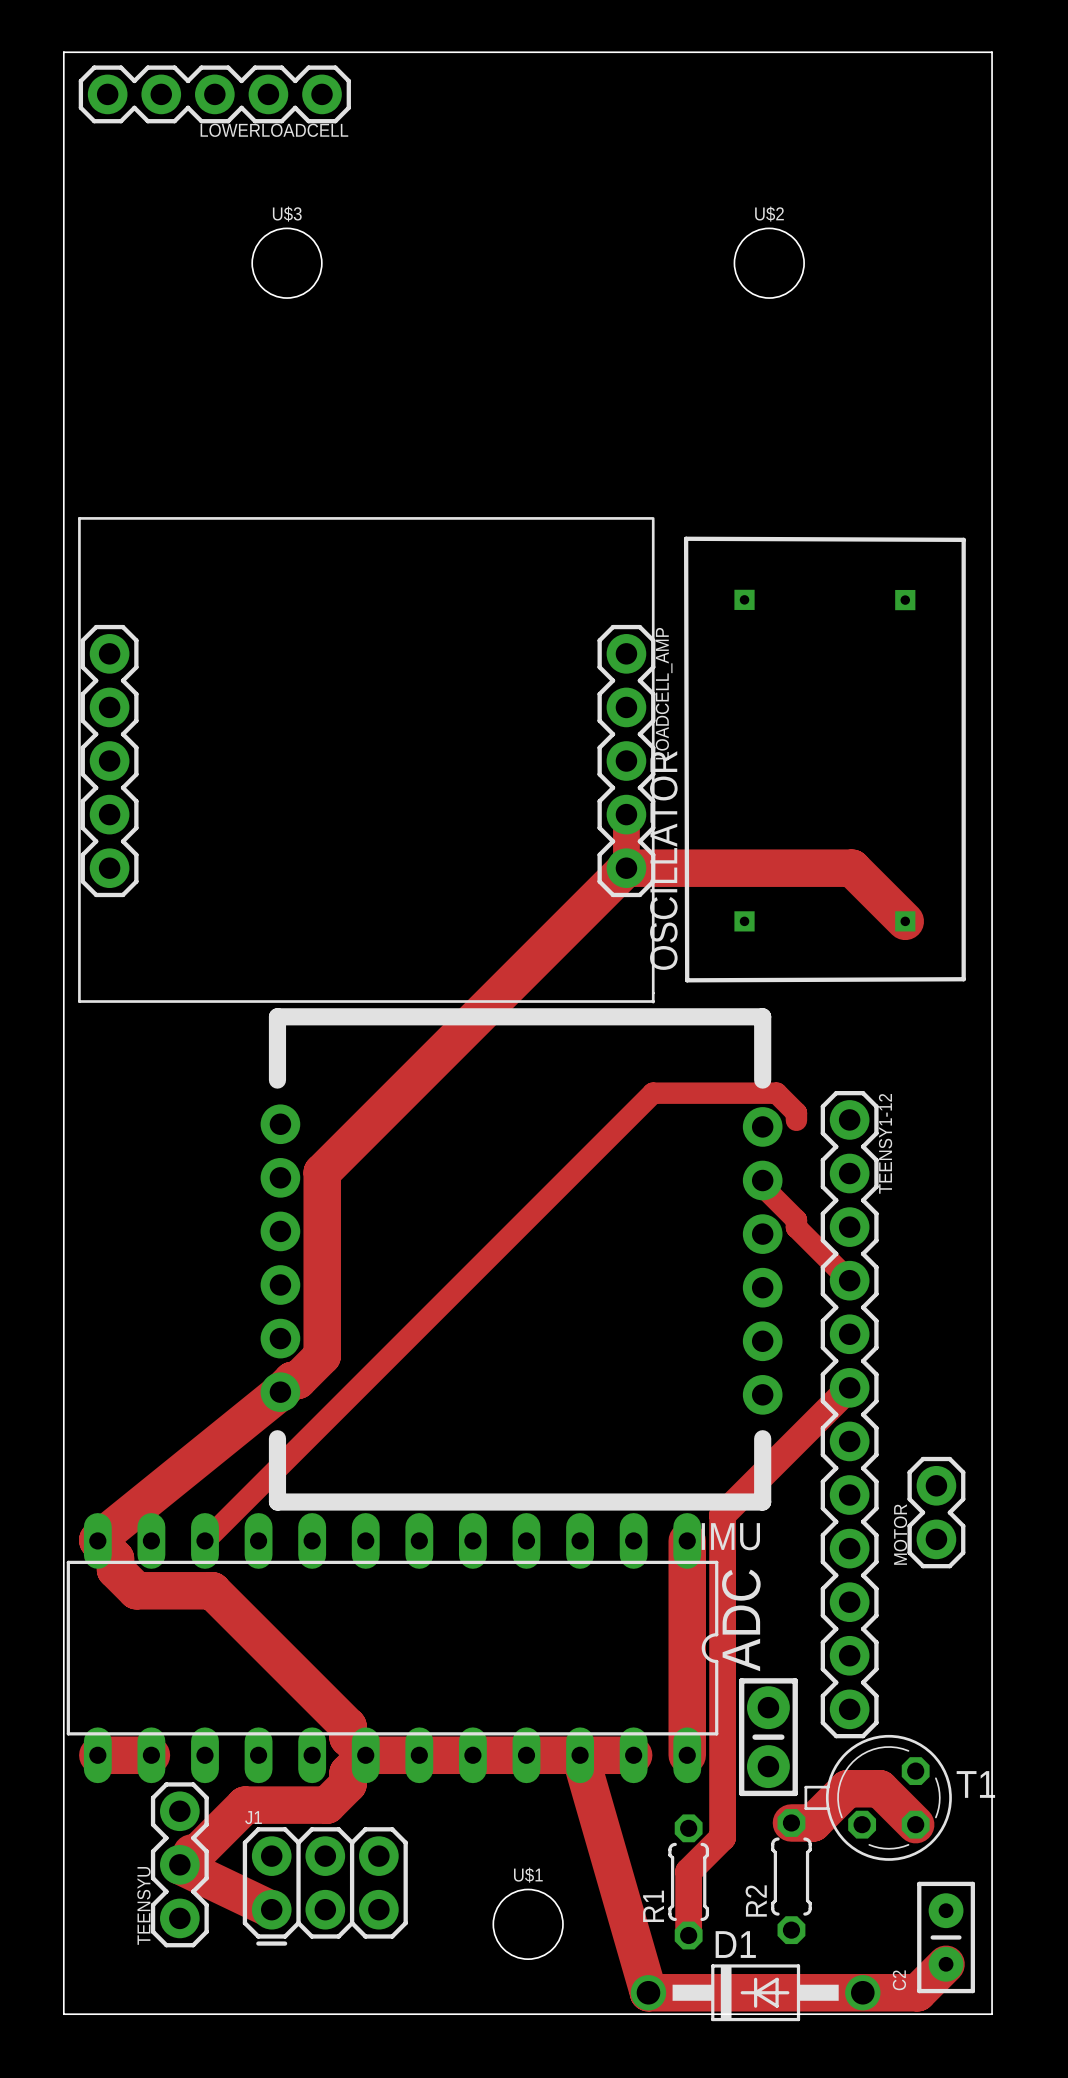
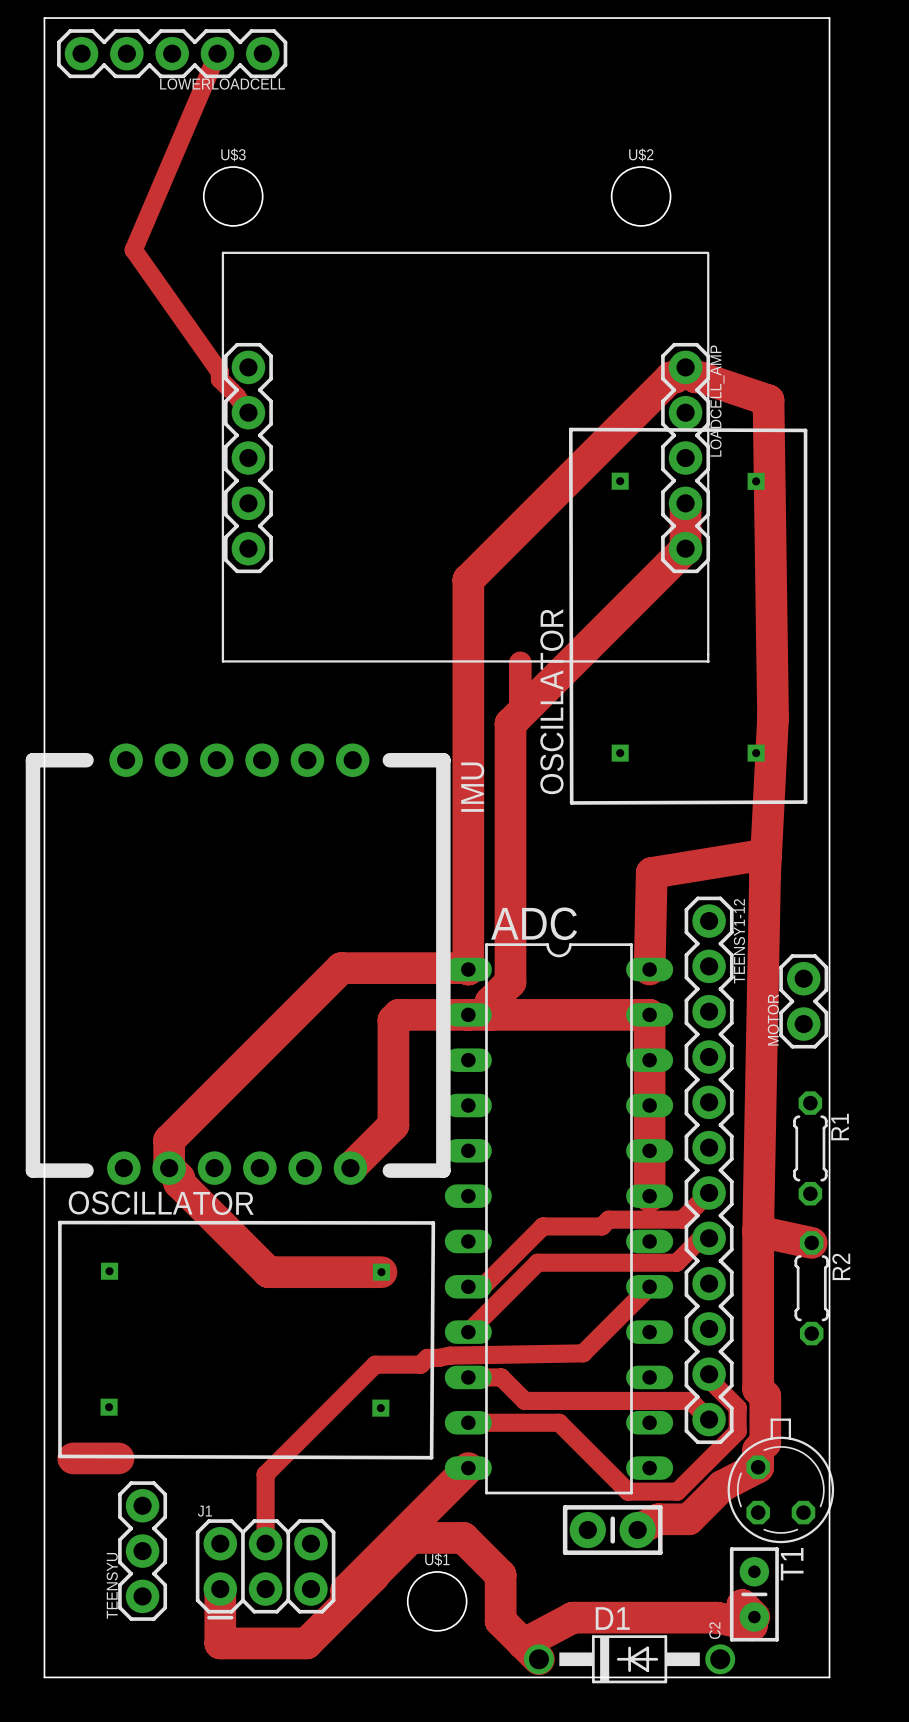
track: none -> (217, 53) (133, 249) (219, 372) (219, 379) (236, 395) (248, 412)
track: none -> (685, 503) (685, 548) (510, 723) (510, 982) (490, 1002) (490, 1014)
LOADCELL_AMP position: (366, 760) -> (465, 457)
track: (905, 921) (852, 868) (626, 868) (322, 1172) (322, 1355) (297, 1380) (292, 1380) (280, 1392) (97, 1540) -> none
track: none -> (766, 854) (651, 872) (649, 969)
track: (796, 1120) (796, 1112) (776, 1093) (653, 1093) (205, 1540) -> none
track: (762, 1186) (796, 1220) (796, 1227) (849, 1280) -> none
IMU rotation: 0° (521, 1259) -> 90° counterclockwise (238, 964)
track: (849, 1387) (722, 1514) (722, 1837) (688, 1871) (688, 1935) -> none
track: none -> (350, 1168) (393, 1125) (393, 1020) (398, 1014) (649, 1014) (649, 1196)
track: none -> (709, 1192) (682, 1219) (608, 1219) (601, 1226) (542, 1226) (482, 1286) (468, 1286)
track: none -> (758, 1231) (811, 1242)
track: none -> (758, 1231) (765, 875) (773, 718) (768, 400) (695, 377) (685, 367) (675, 377) (670, 377) (468, 579) (468, 969) (341, 968) (169, 1140) (169, 1168) (179, 1178) (179, 1182) (268, 1272) (381, 1272)
track: none -> (758, 1231) (758, 1389) (765, 1396) (765, 1442) (758, 1449) (758, 1467) (722, 1486) (688, 1519) (658, 1519) (637, 1530)
track: none -> (709, 1238) (701, 1238) (676, 1262) (537, 1262) (468, 1332)
MOTOR position: (936, 1512) -> (803, 1001)
track: (687, 1540) (687, 1755) -> none
track: (104, 1547) (115, 1558) (115, 1569) (136, 1590) (212, 1590) (348, 1726) (348, 1737) (365, 1755) -> none
track: none -> (649, 1286) (583, 1353) (450, 1355) (427, 1357) (420, 1364) (375, 1364) (265, 1474) (265, 1543)
OSCILLATOR: none -> (246, 1340)
ADC rotation: 0° (392, 1648) -> 90° counterclockwise (558, 1218)
track: none -> (709, 1374) (709, 1379) (737, 1407) (737, 1431) (677, 1491) (628, 1491) (559, 1422) (468, 1422)
track: none -> (468, 1377) (501, 1377) (524, 1400) (690, 1400) (709, 1419)
part rotation: 0° (768, 1737) -> 90° clockwise (612, 1530)
part position: (768, 1737) -> (612, 1530)
track: (365, 1755) (633, 1755) -> none
track: (365, 1755) (348, 1772) (348, 1784) (327, 1805) (245, 1805) (197, 1853) (191, 1853) -> none
track: (580, 1755) (648, 1992) (917, 1992) (946, 1964) -> none
track: none -> (468, 1468) (346, 1590) (346, 1603)
T1 rotation: 0° (878, 1797) -> 90° clockwise (780, 1480)
track: (791, 1822) (813, 1822) (847, 1788) (879, 1788) (915, 1824) -> none
track: (179, 1865) (271, 1909) -> (538, 1659) (500, 1620) (500, 1575) (463, 1537) (410, 1537) (306, 1643) (220, 1643) (220, 1589)
R2 position: (791, 1876) -> (811, 1288)
R1 position: (688, 1881) -> (810, 1148)
R2 name position: R2 (756, 1900) -> R2 (841, 1266)
R1 name position: R1 (653, 1906) -> R1 (840, 1127)
C2 position: (946, 1937) -> (754, 1594)
track: none -> (754, 1617) (742, 1605) (751, 1625) (716, 1617) (572, 1617) (523, 1643)

